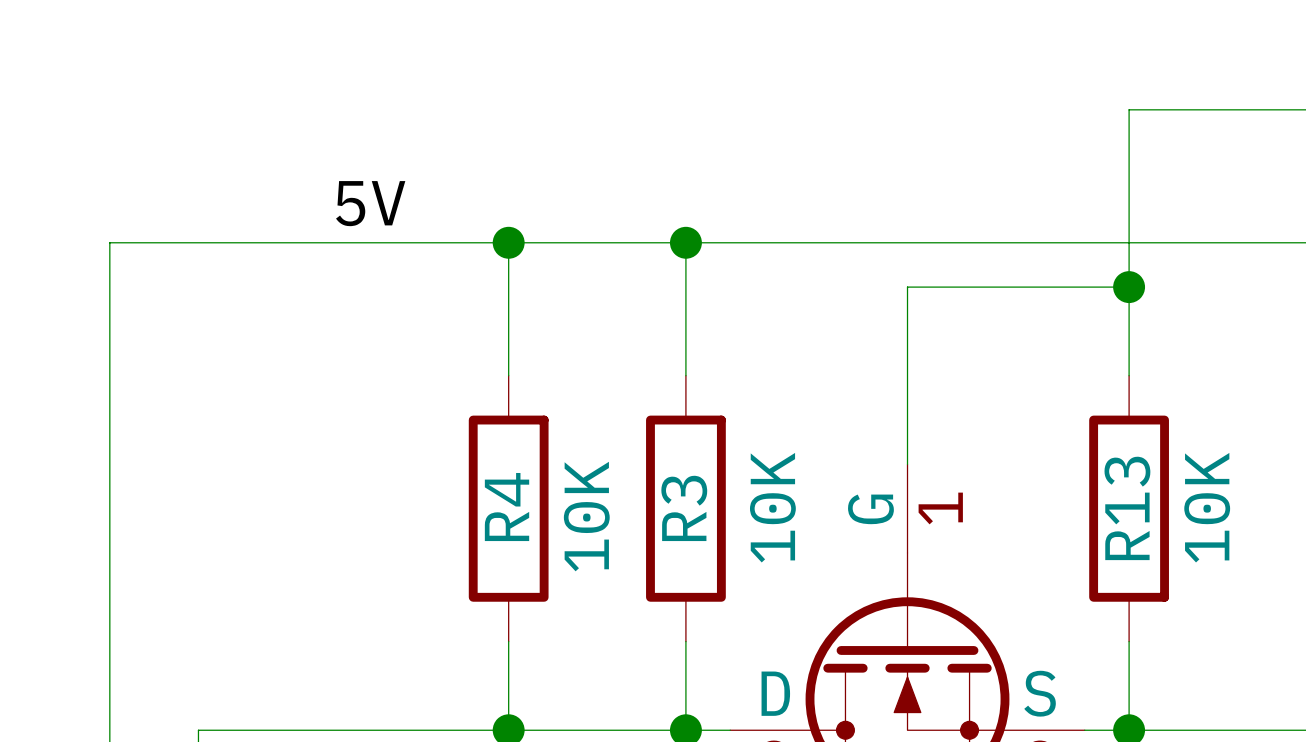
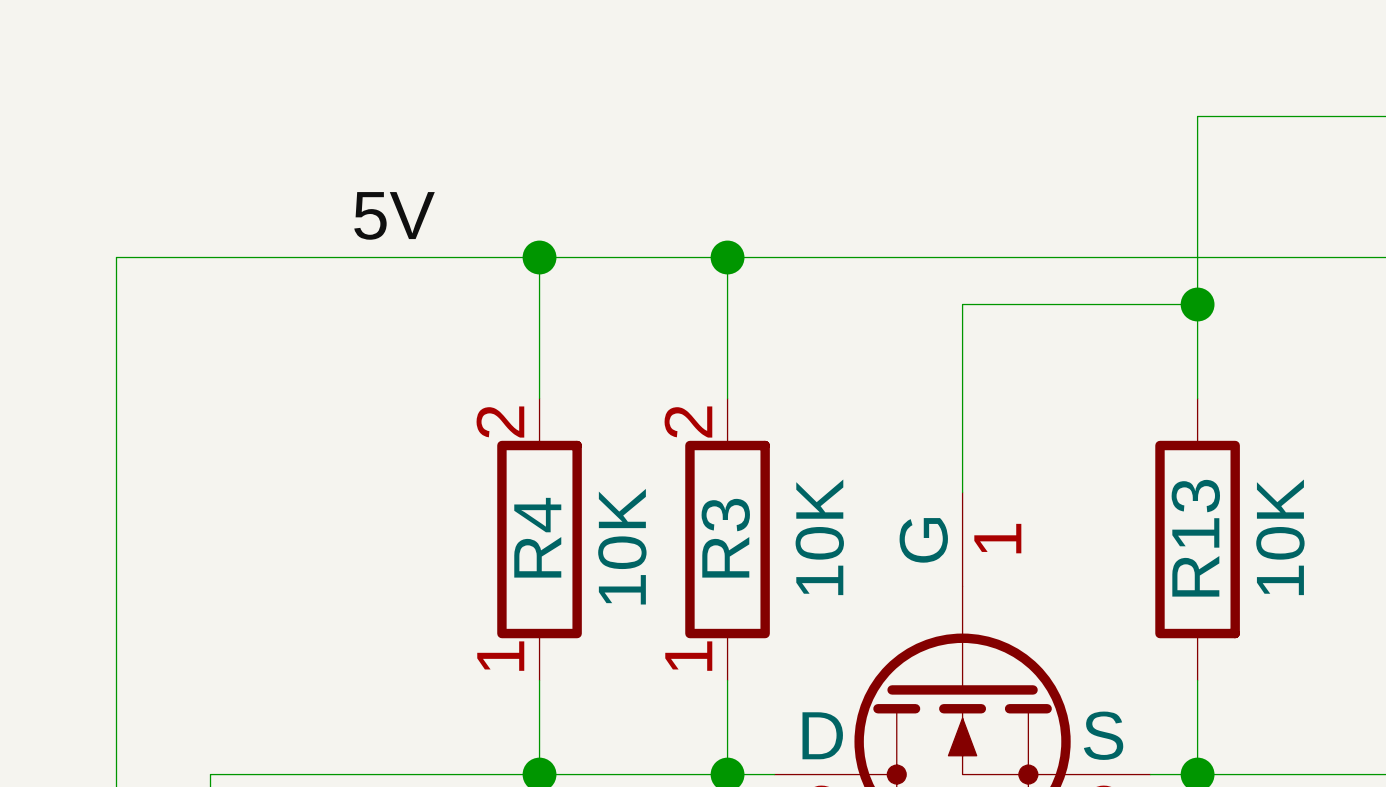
R4 pin number: none -> 2 (500, 422)
R3 pin number: none -> 2 (688, 422)
R4 pin number: none -> 1 (500, 656)
R3 pin number: none -> 1 (688, 656)

